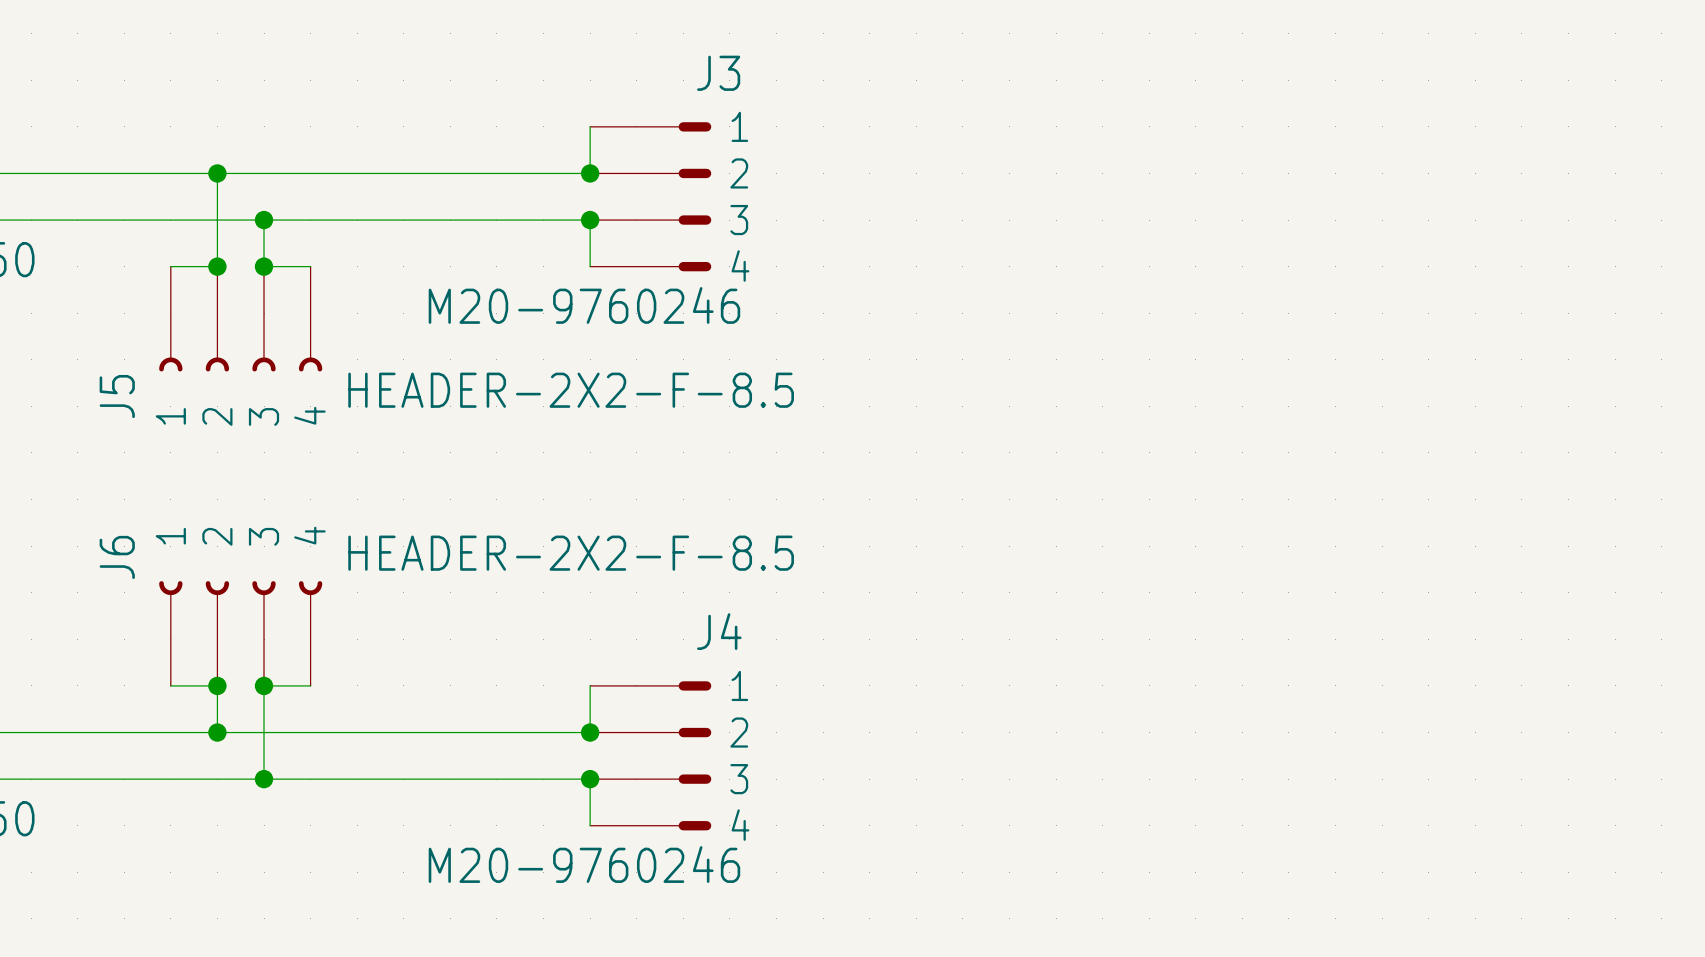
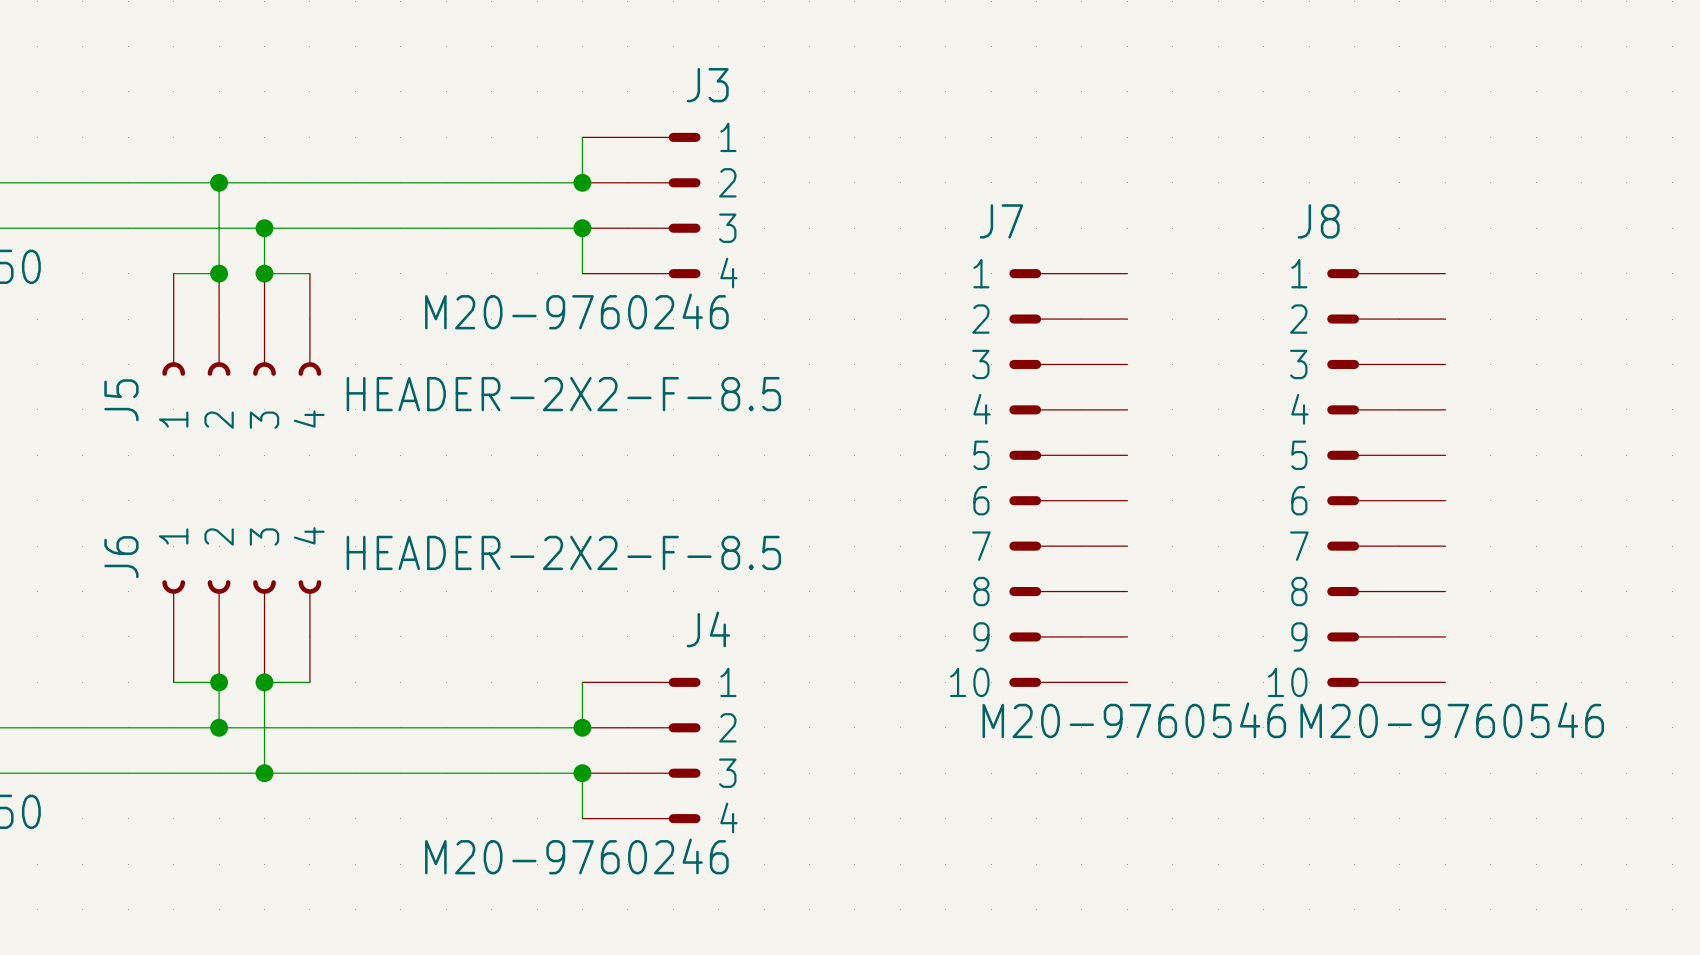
J7: none -> M20-9760546 (1068, 478)
J8: none -> M20-9760546 (1386, 478)

